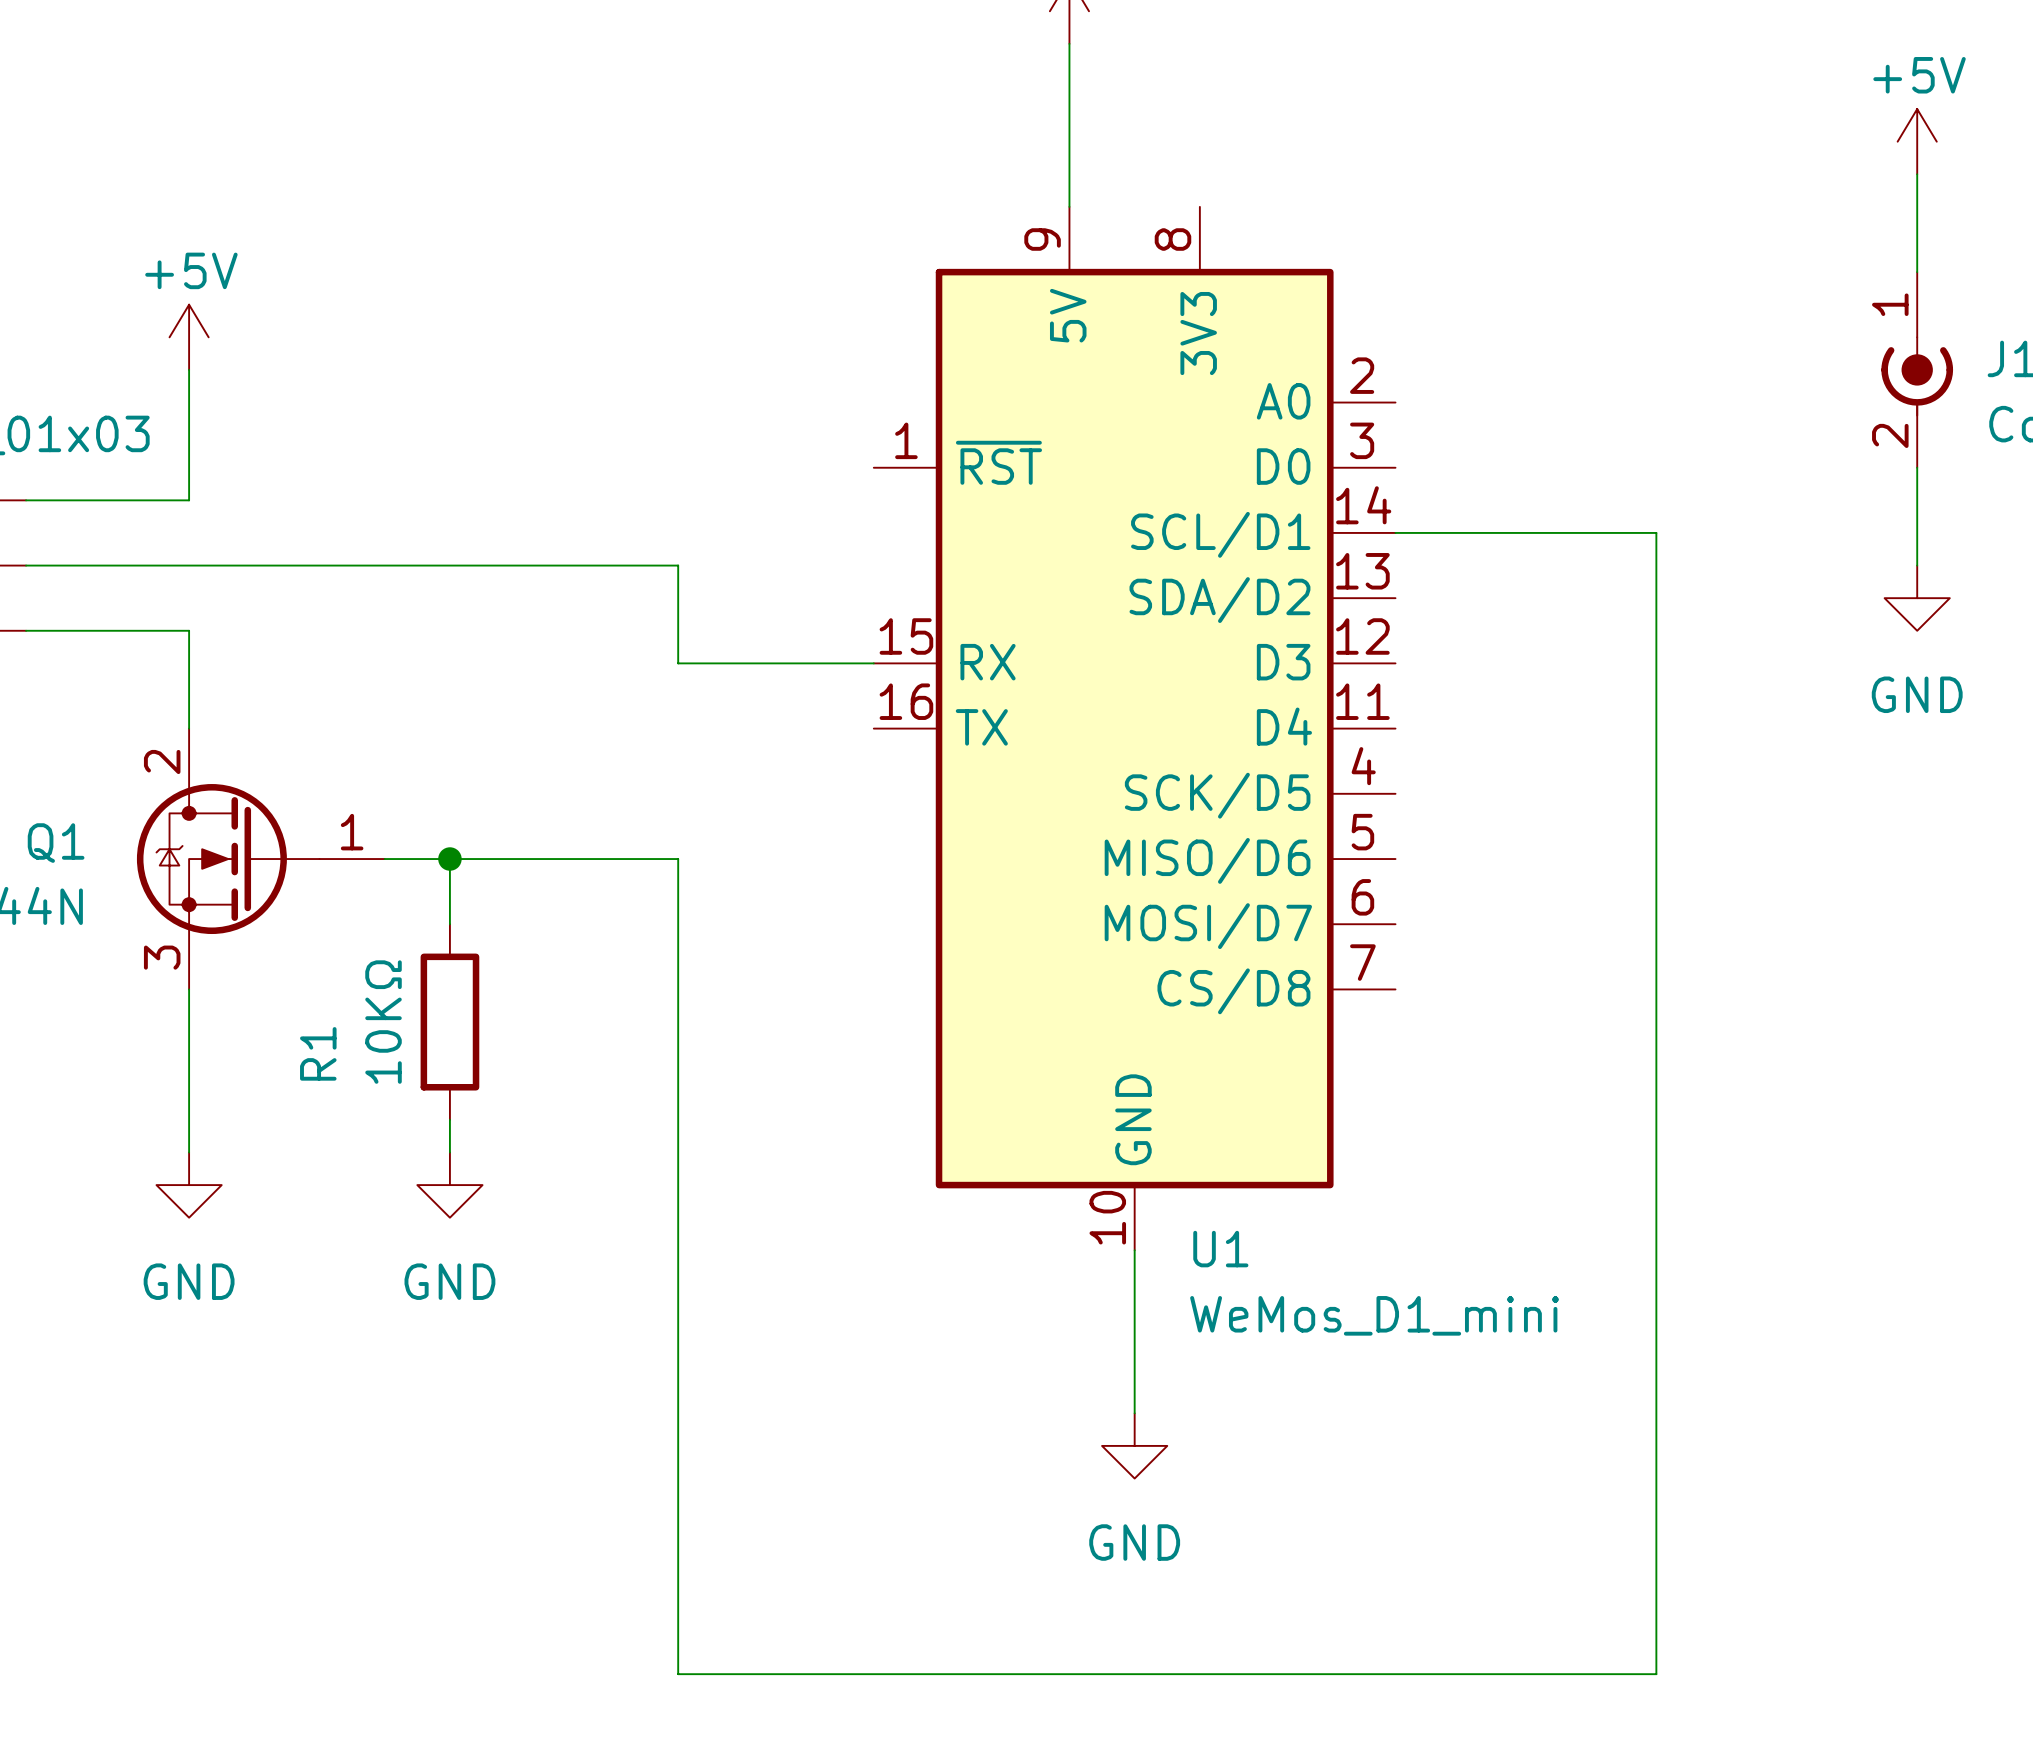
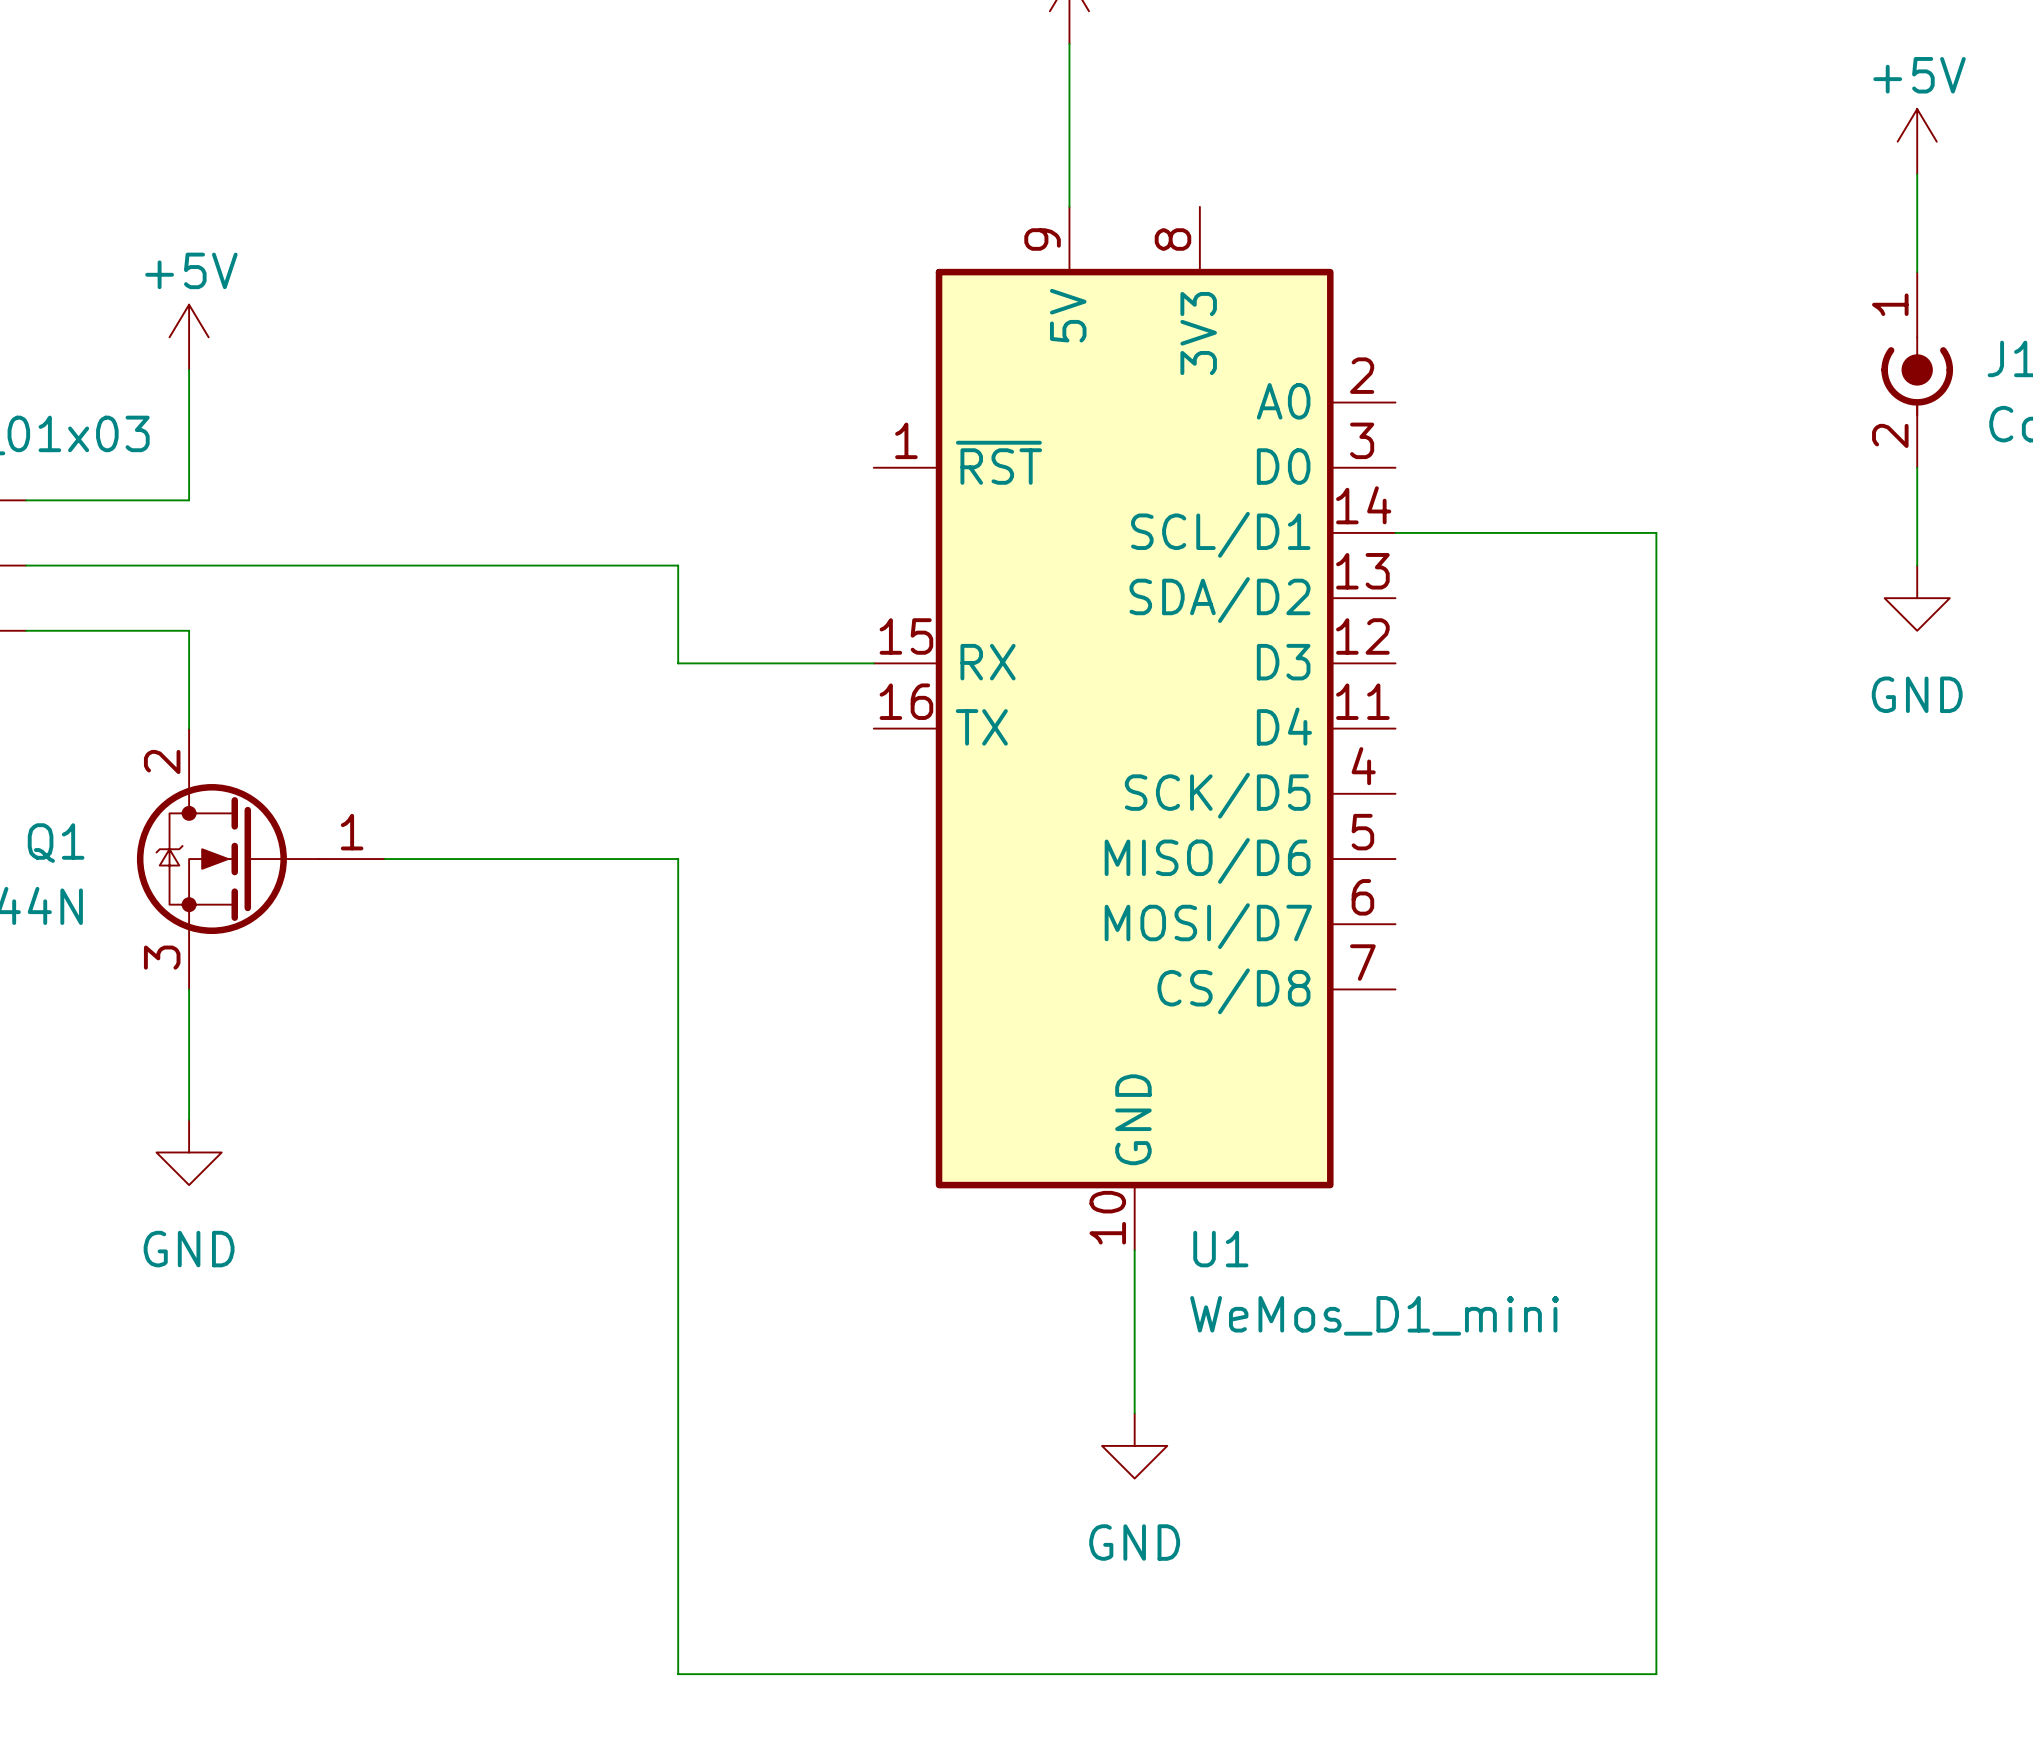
wire: (449, 859) (449, 924) -> none
junction: (449, 859) -> none
R1: 10KΩ (449, 1022) -> none
wire: (449, 1119) (449, 1152) -> none
power symbol position: GND (189, 1185) -> GND (189, 1152)
power symbol: GND (449, 1185) -> none

